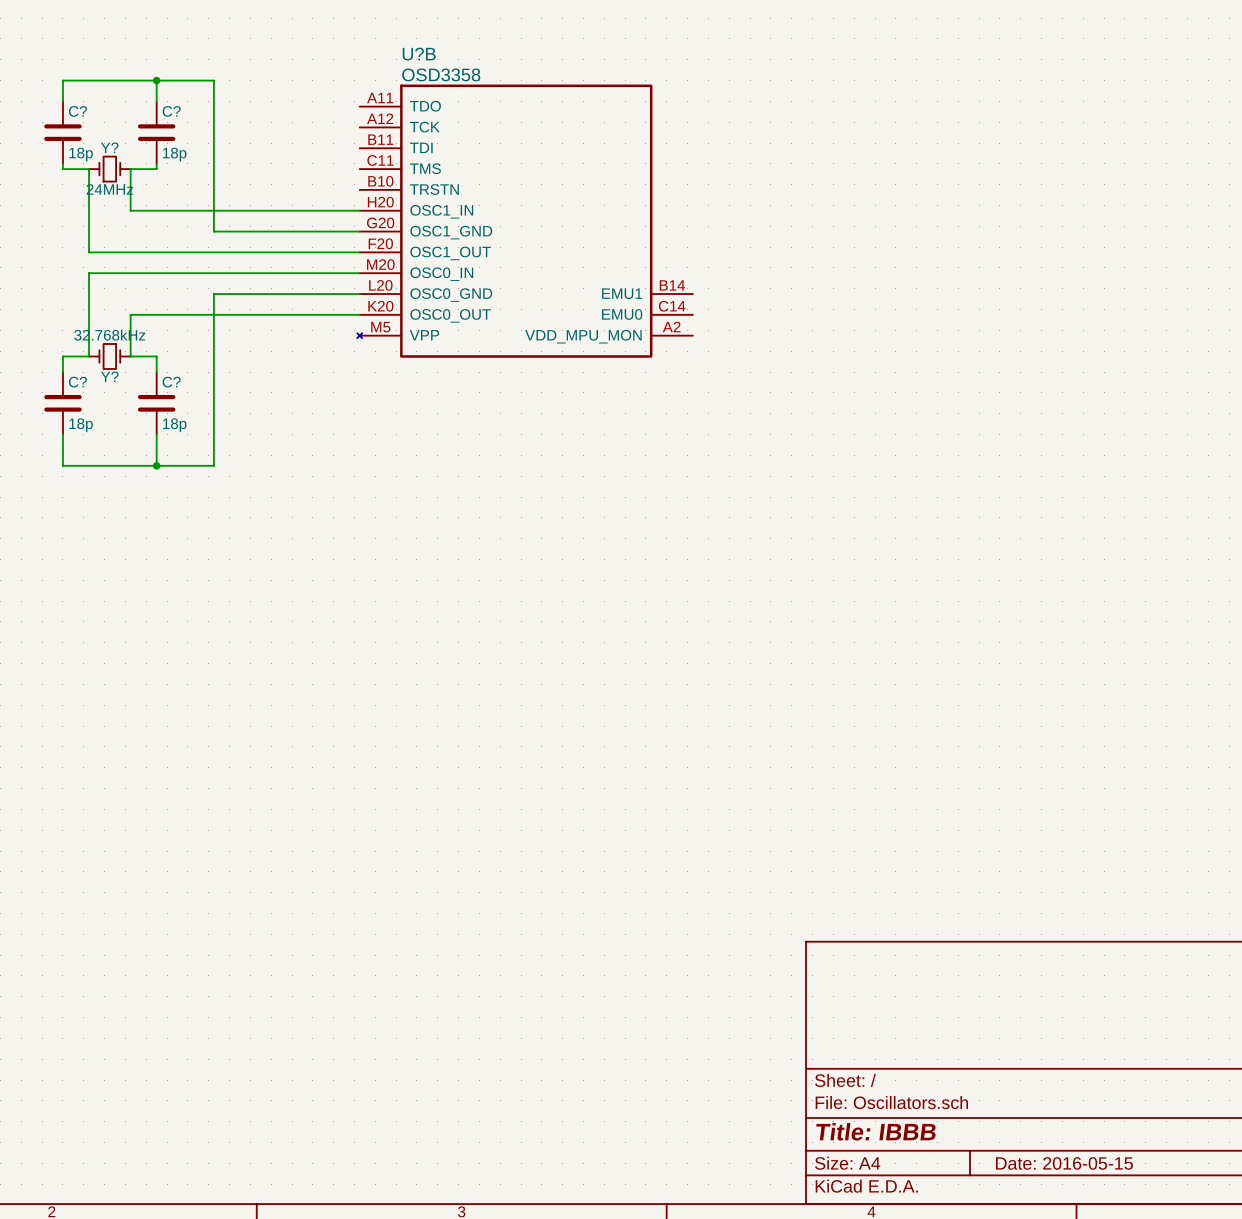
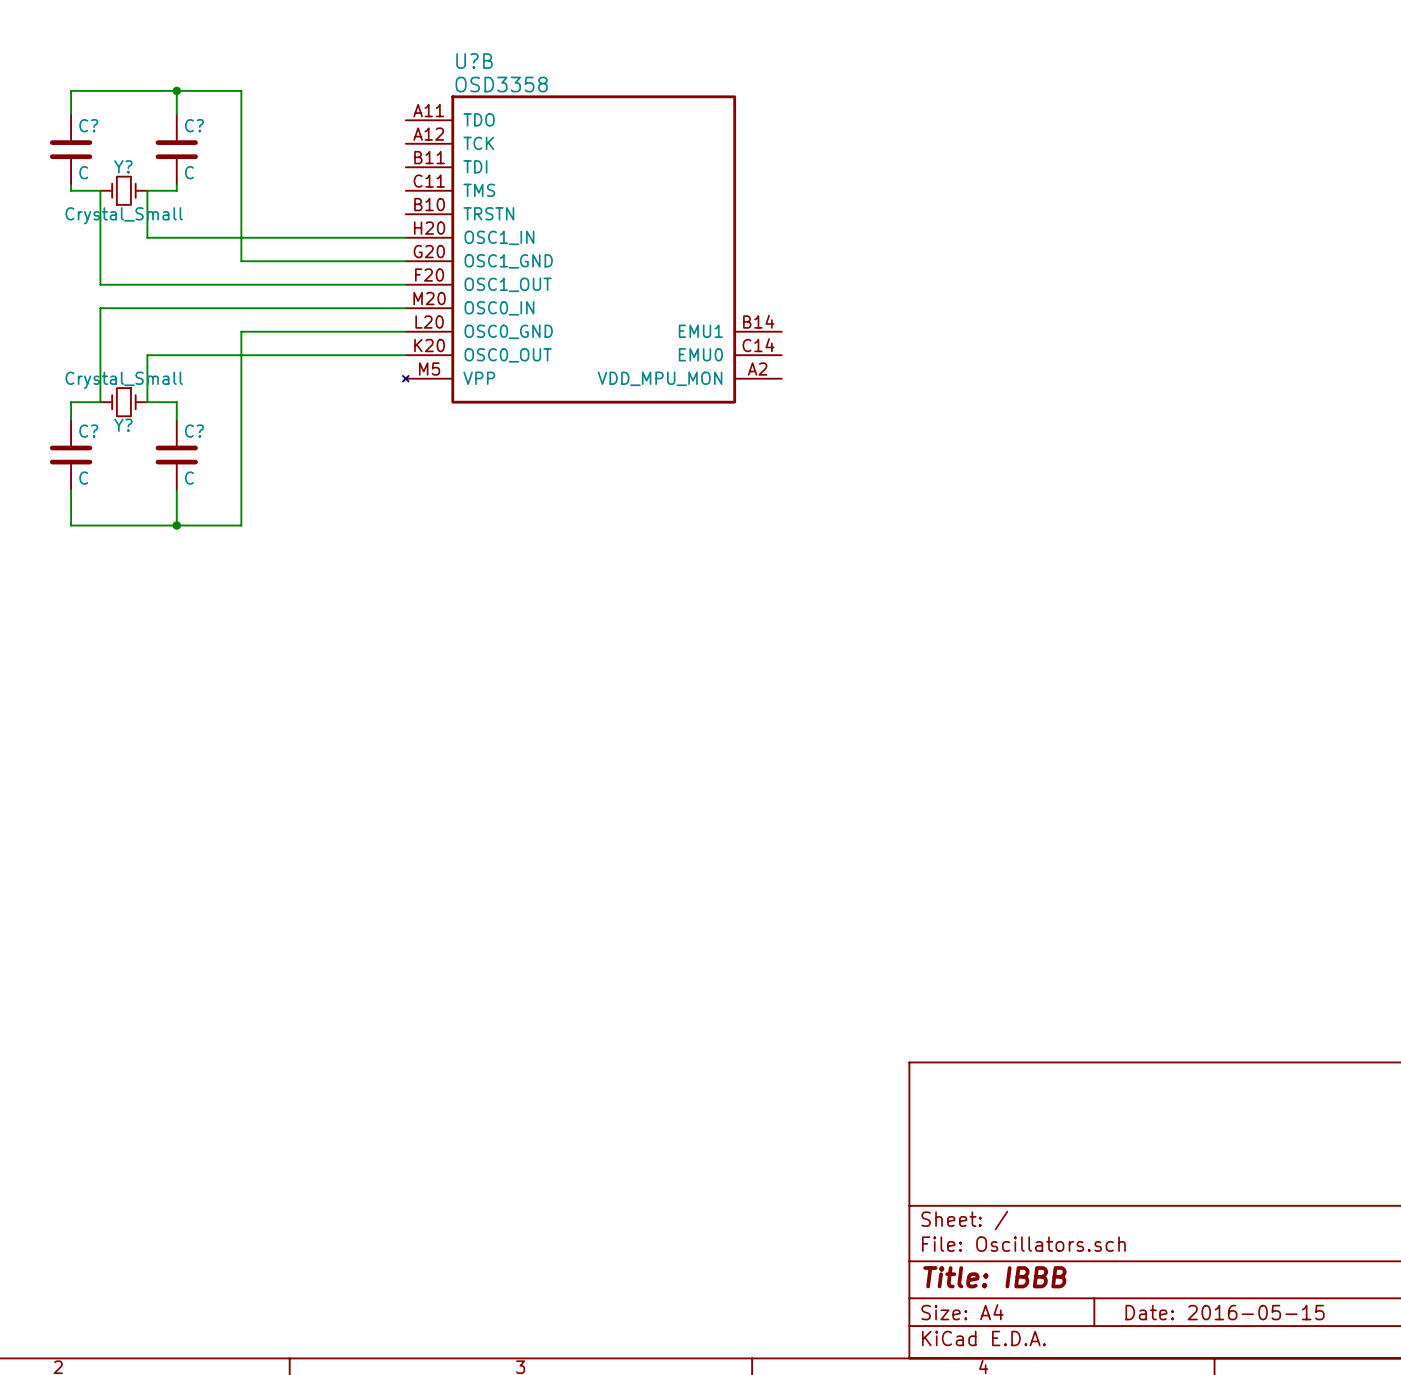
C? value: 18p (81, 154) -> C (83, 172)
C? value: 18p (174, 154) -> C (189, 172)
Y? value: 24MHz (109, 189) -> Crystal_Small (124, 215)
Y? value: 32.768kHz (109, 335) -> Crystal_Small (124, 380)
C? value: 18p (81, 425) -> C (83, 478)
C? value: 18p (174, 425) -> C (189, 478)

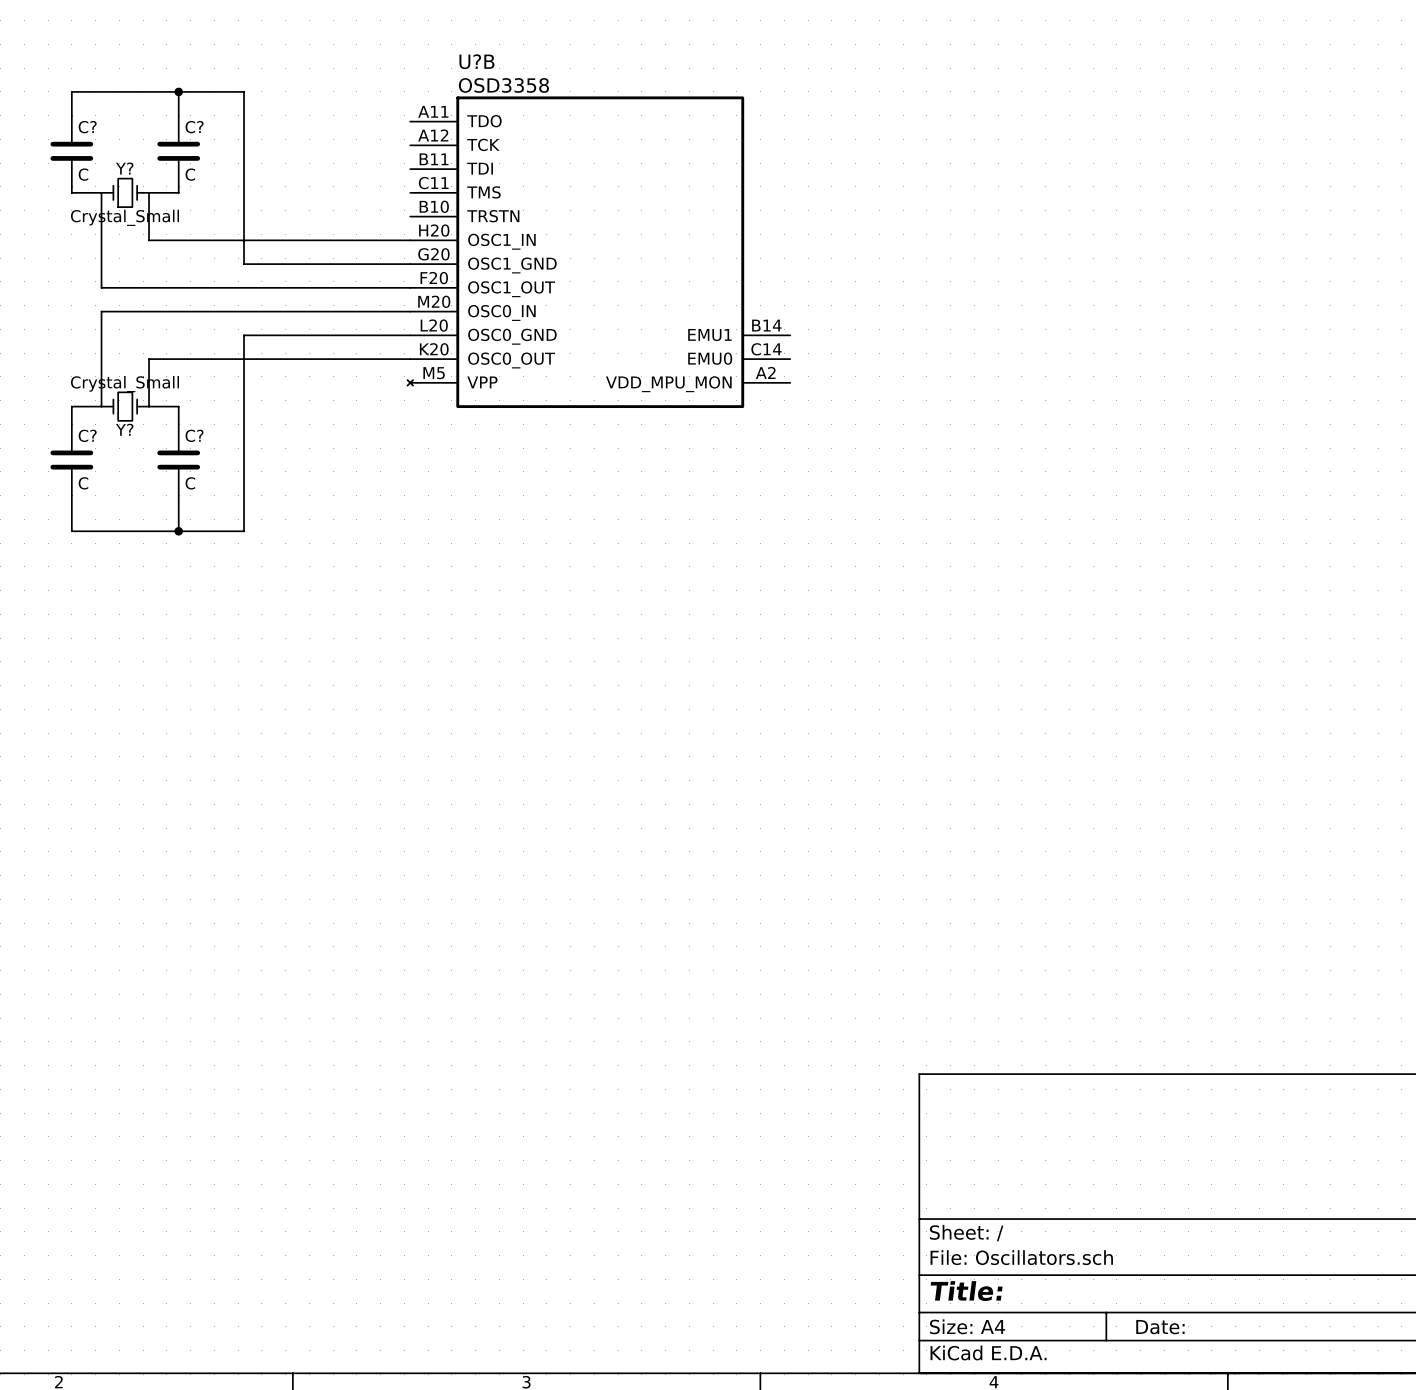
title block: Title: IBBB (994, 1277) -> Title: (966, 1291)
title block: Date: 2016-05-15 (1225, 1312) -> Date: (1160, 1327)

